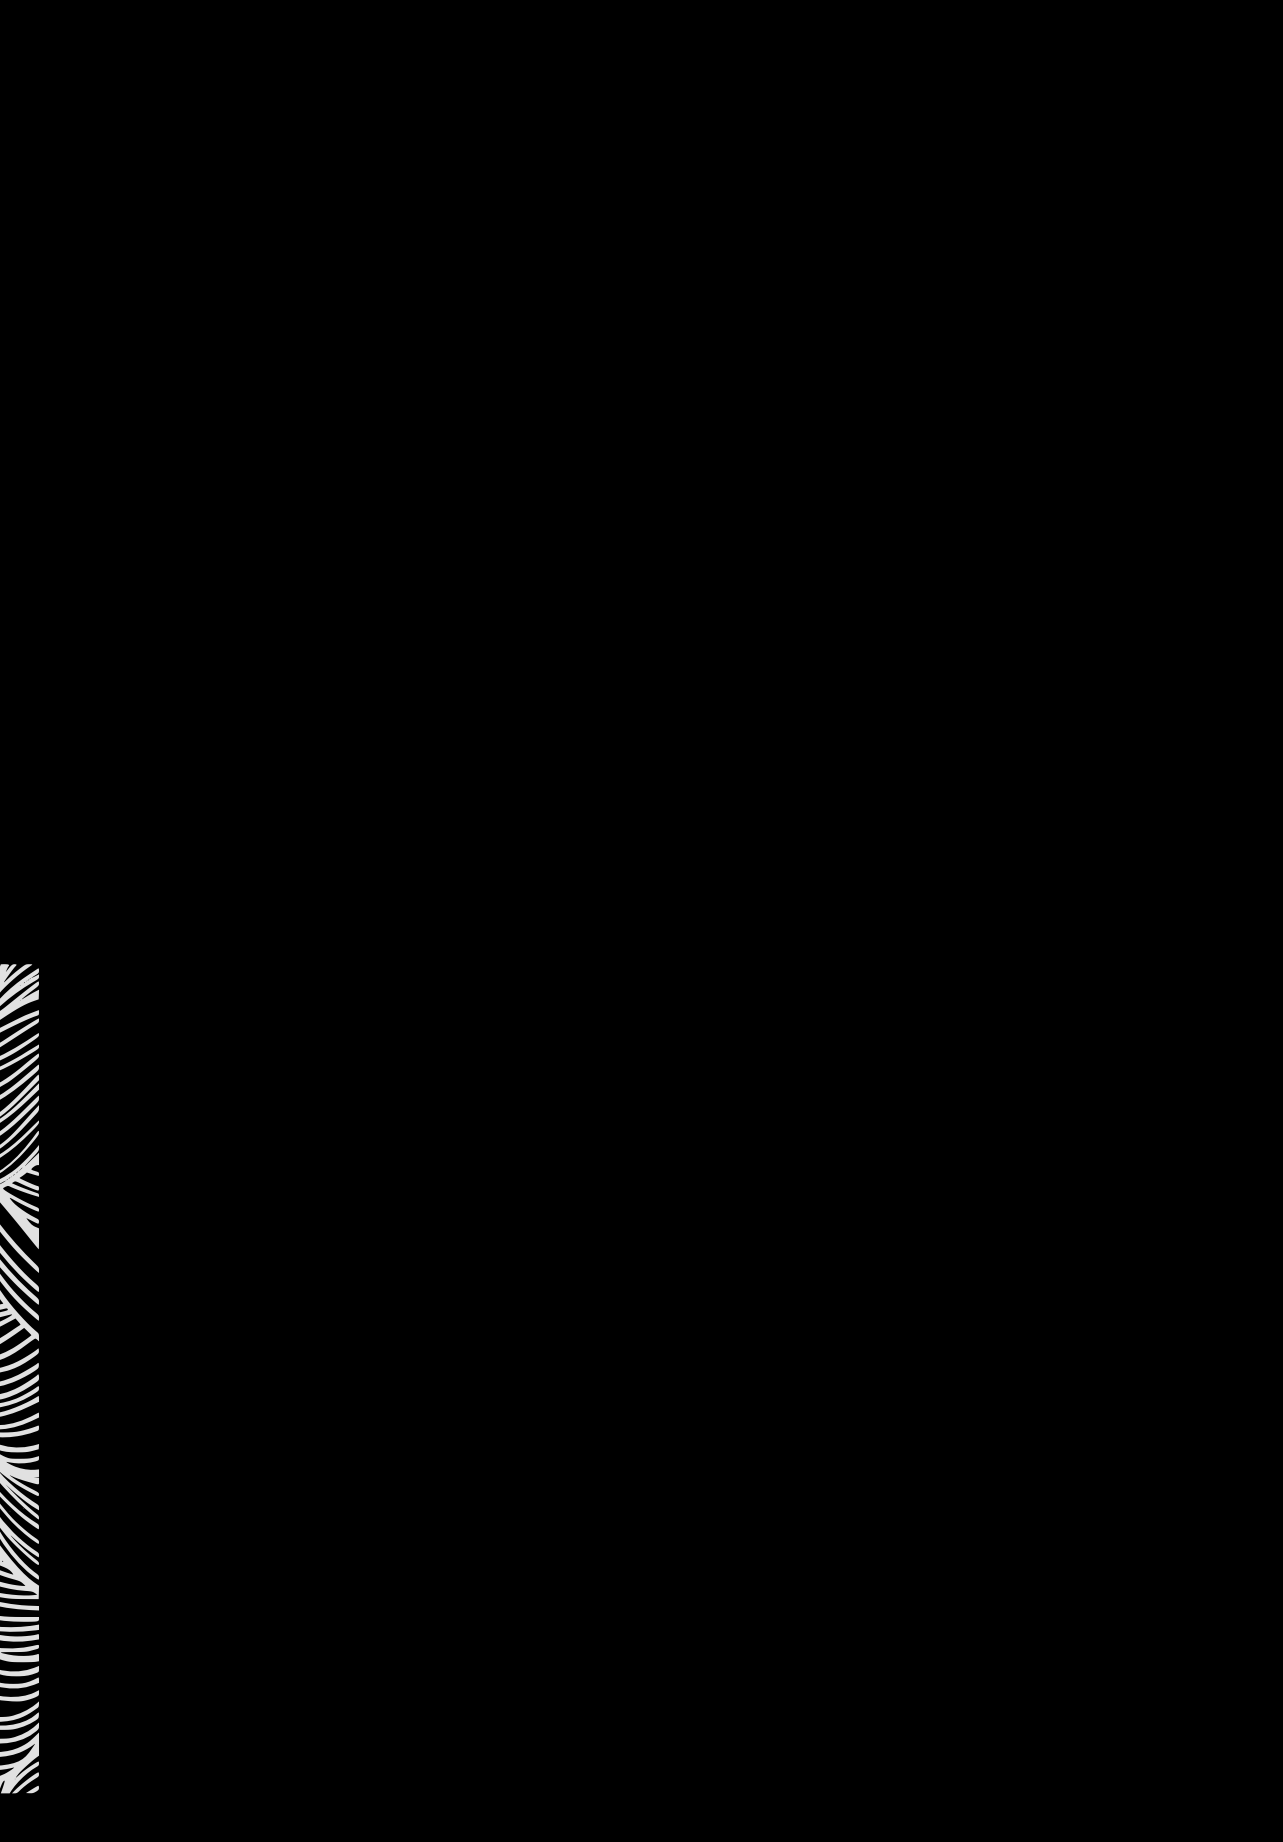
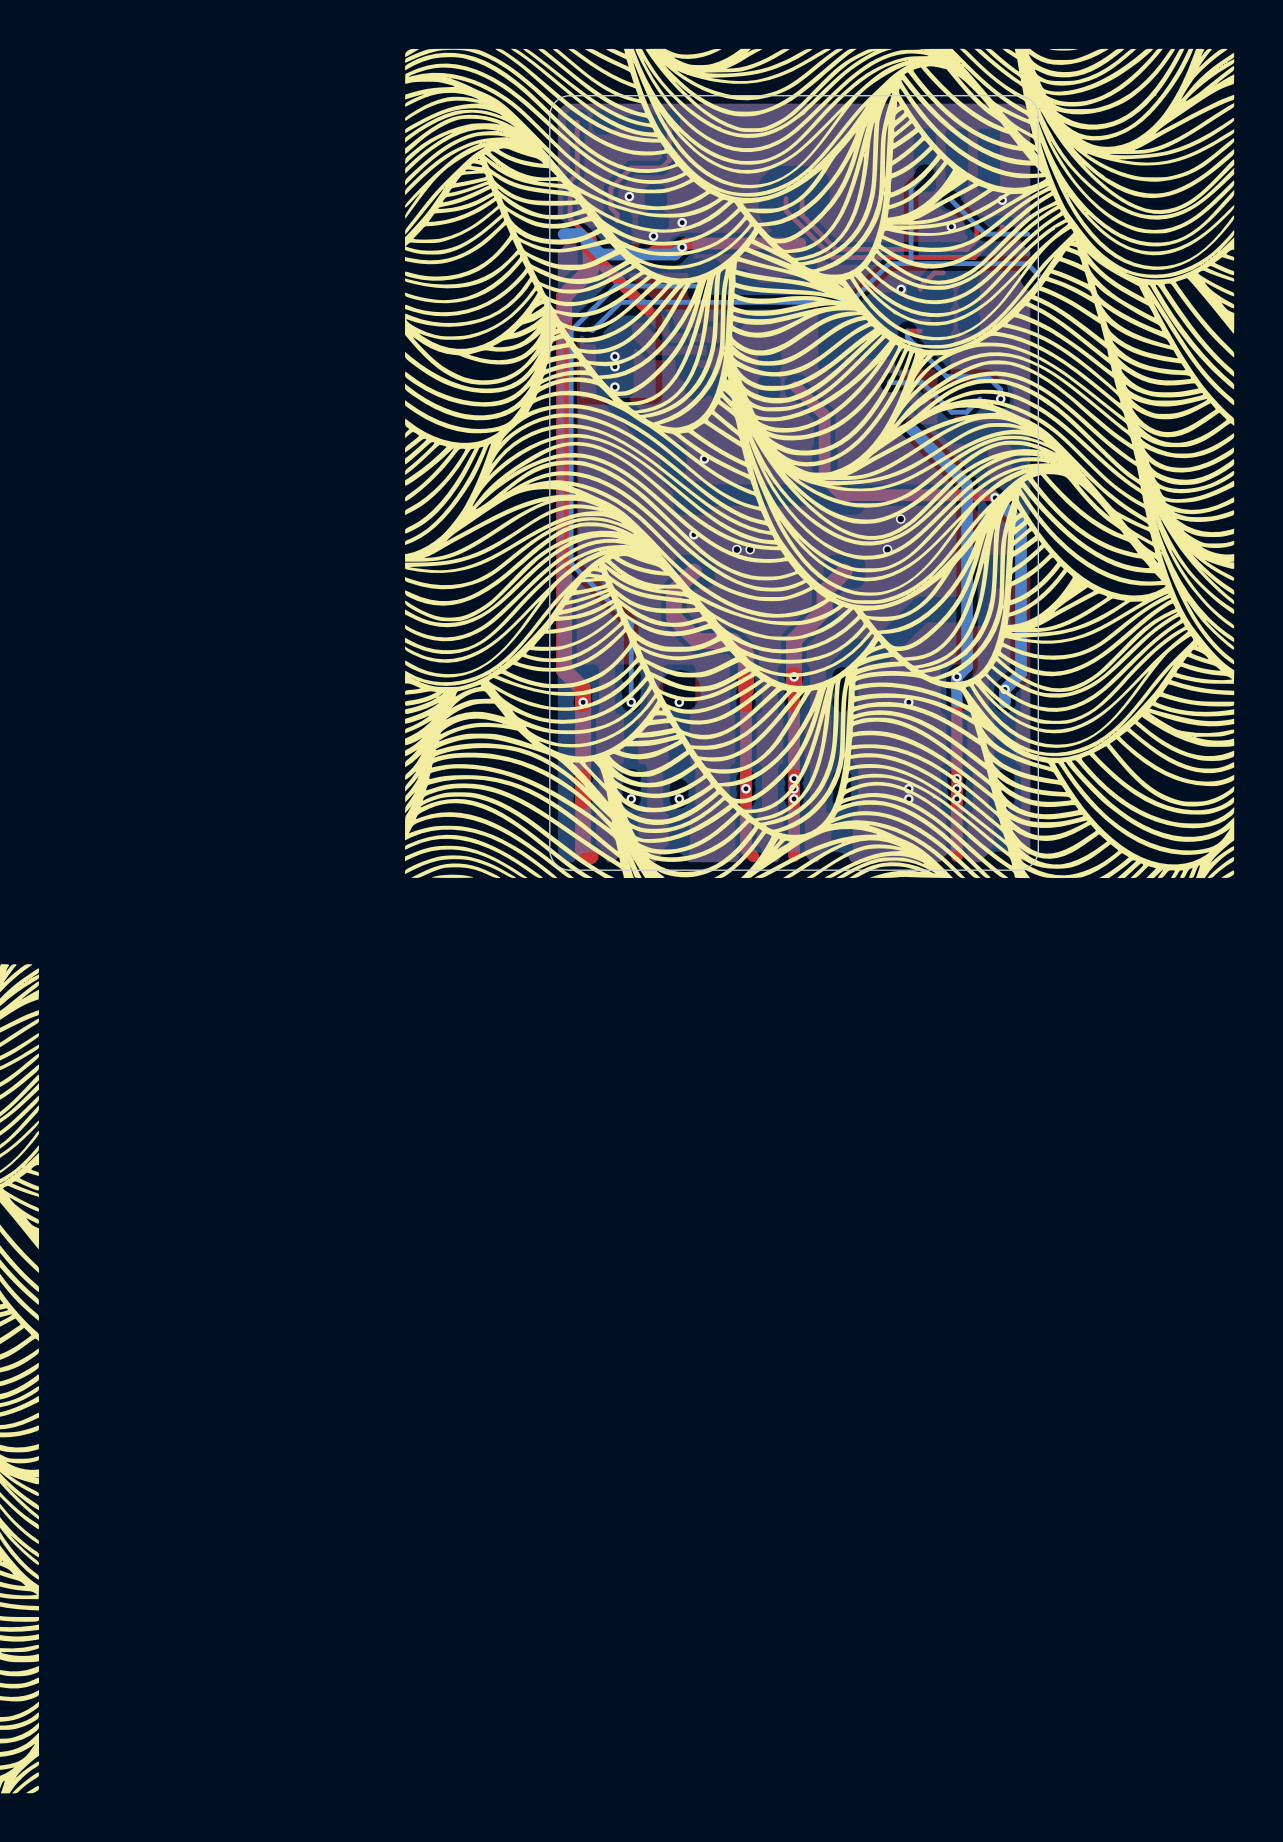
drawing: none -> [404, 48, 1235, 879]
board edge: none -> (1017, 95) (570, 95) (559, 98) (552, 105) (549, 116) (549, 849) (551, 858) (559, 867) (570, 870) (1017, 870) (1026, 868) (1035, 860) (1038, 849) (1038, 116) (1036, 107) (1032, 101) (1026, 97) (1017, 95)
top track: none -> (577, 122) (577, 174) (570, 181) (570, 218) (587, 236) (590, 248) (590, 269) (564, 296) (564, 670) (583, 689) (583, 848) (590, 856)
top track: none -> (668, 122) (669, 160) (661, 167) (631, 167) (610, 188) (610, 207) (617, 214) (617, 220)
bottom track: none -> (924, 174) (911, 187) (911, 262) (889, 263) (850, 302) (620, 302) (590, 330)
via: none -> (629, 196)
top track: none -> (786, 198) (786, 210) (832, 257) (974, 257) (1002, 229) (1002, 226)
top track: none -> (802, 198) (802, 215) (835, 249) (967, 249) (976, 239) (976, 226)
bottom track: none -> (951, 200) (985, 234) (1027, 234)
via: none -> (1002, 200)
via: none -> (682, 222)
via: none -> (951, 226)
bottom track: none -> (563, 234) (580, 234) (600, 254) (674, 254) (682, 247)
via: none -> (653, 236)
top track: none -> (800, 243) (685, 243) (678, 251) (653, 251)
via: none -> (682, 247)
top track: none -> (590, 257) (595, 257) (648, 309)
bottom track: none -> (912, 263) (1027, 263) (1038, 274)
top track: none -> (943, 272) (934, 272) (920, 287) (920, 289)
bottom track: none -> (699, 286) (615, 286) (571, 330) (571, 563) (631, 623) (631, 702)
via: none -> (901, 289)
bottom track: none -> (907, 330) (907, 337) (946, 376) (987, 376) (1000, 389) (1000, 398)
top track: none -> (920, 331) (907, 331)
via: none -> (614, 356)
via: none -> (614, 366)
bottom track: none -> (889, 381) (922, 382) (951, 412) (966, 412) (979, 398)
top track: none -> (796, 386) (824, 415) (824, 478) (844, 497) (847, 495) (992, 495)
via: none -> (614, 387)
via: none -> (1000, 398)
bottom track: none -> (911, 428) (967, 484) (967, 666) (956, 676) (956, 702)
via: none -> (704, 459)
bottom track: none -> (995, 497) (1021, 523) (1021, 673) (1004, 689) (1004, 702)
via: none -> (995, 497)
via: none -> (900, 519)
via: none -> (693, 534)
via: none -> (736, 549)
via: none -> (750, 549)
via: none -> (887, 549)
top track: none -> (693, 571) (674, 591) (674, 617) (697, 641) (732, 641) (745, 654) (745, 848) (753, 856)
top track: none -> (844, 571) (824, 591) (824, 609) (794, 640) (794, 856)
via: none -> (794, 676)
via: none -> (956, 676)
via: none -> (1004, 689)
via: none -> (583, 702)
via: none -> (631, 702)
via: none -> (679, 702)
via: none -> (908, 702)
top track: none -> (956, 702) (956, 856)
via: none -> (794, 778)
via: none -> (956, 778)
via: none -> (745, 788)
via: none -> (794, 788)
via: none -> (908, 788)
via: none -> (956, 788)
via: none -> (631, 798)
via: none -> (679, 798)
via: none -> (794, 798)
via: none -> (908, 798)
via: none -> (956, 798)

